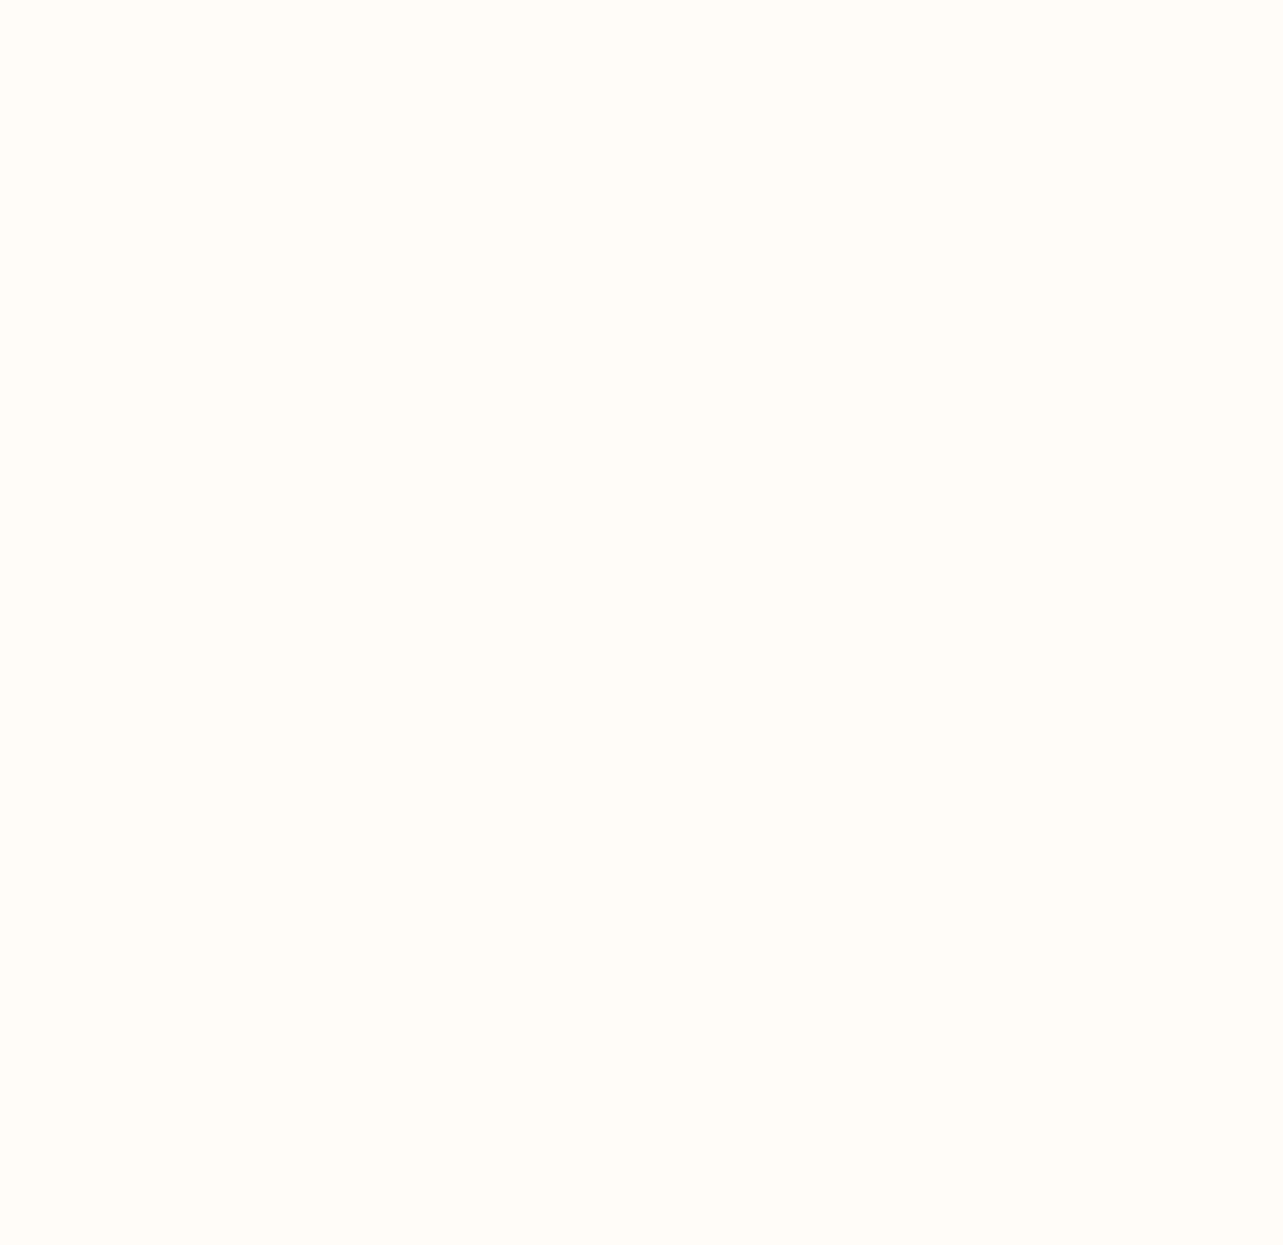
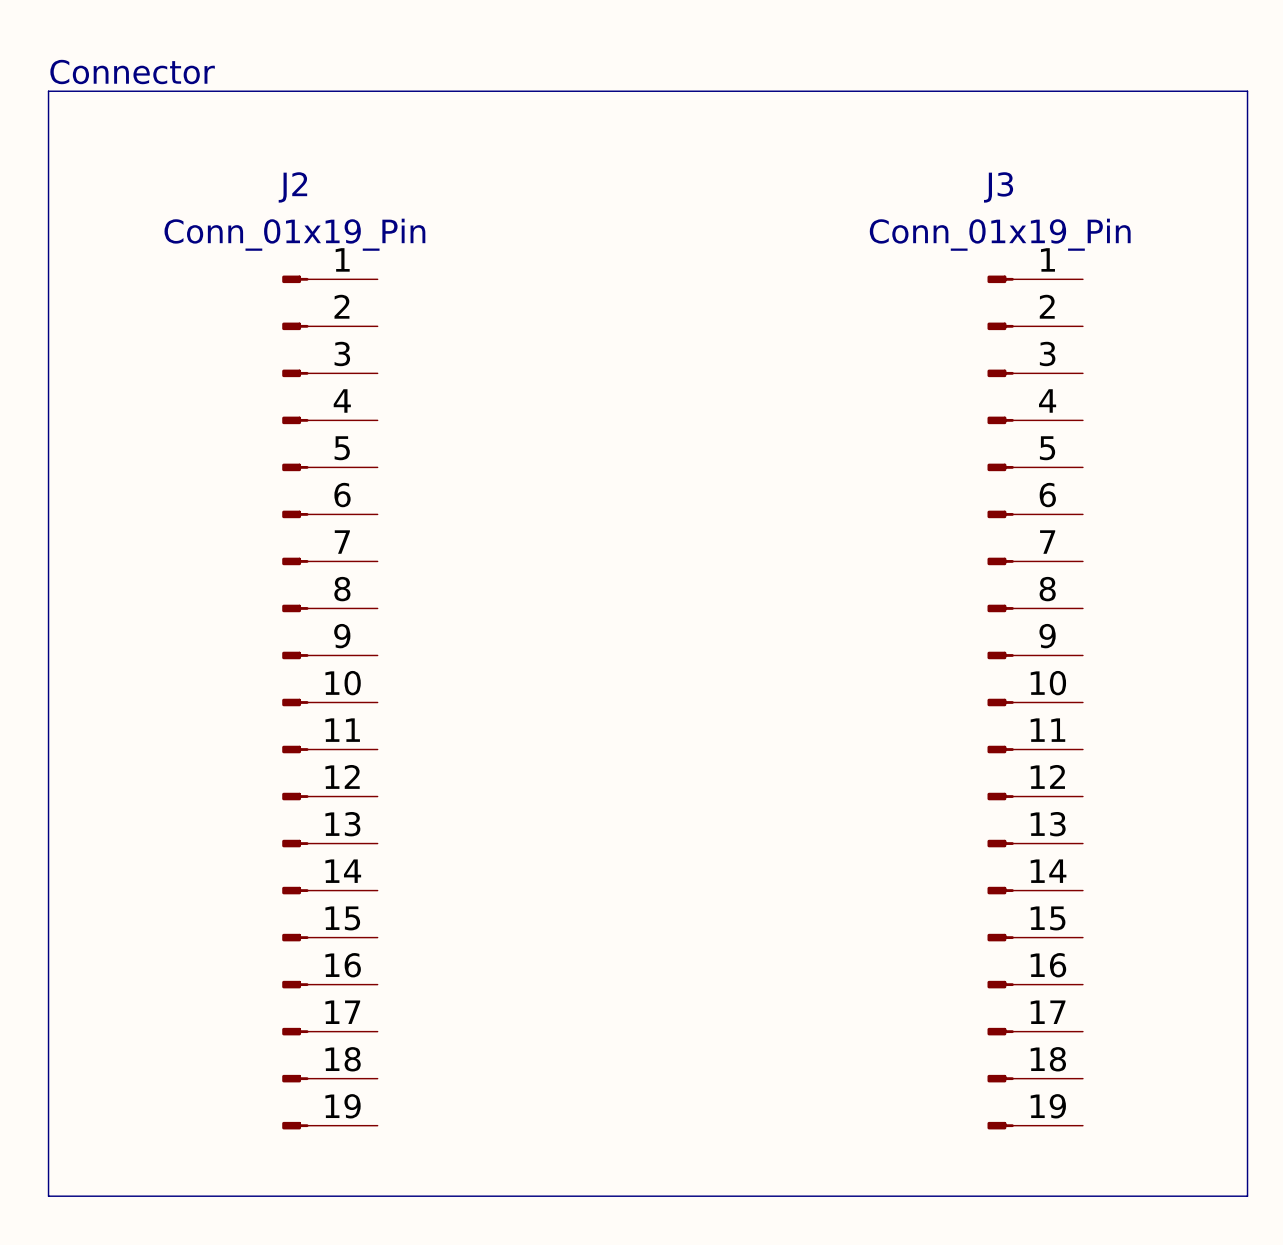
text: none -> Connector (132, 72)
line: none -> (48, 91) (1247, 91) (1247, 1196) (48, 1196) (48, 91)
J2: none -> Conn_01x19_Pin (329, 702)
J3: none -> Conn_01x19_Pin (1035, 702)

